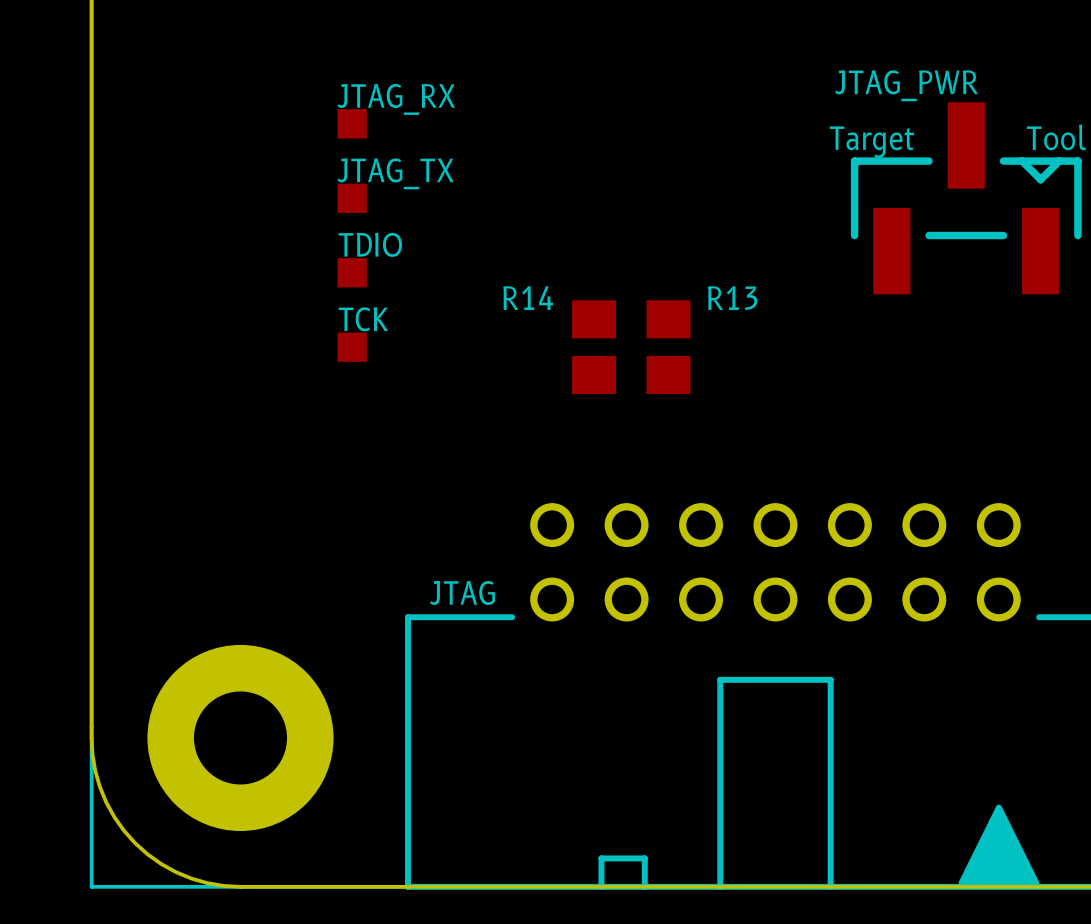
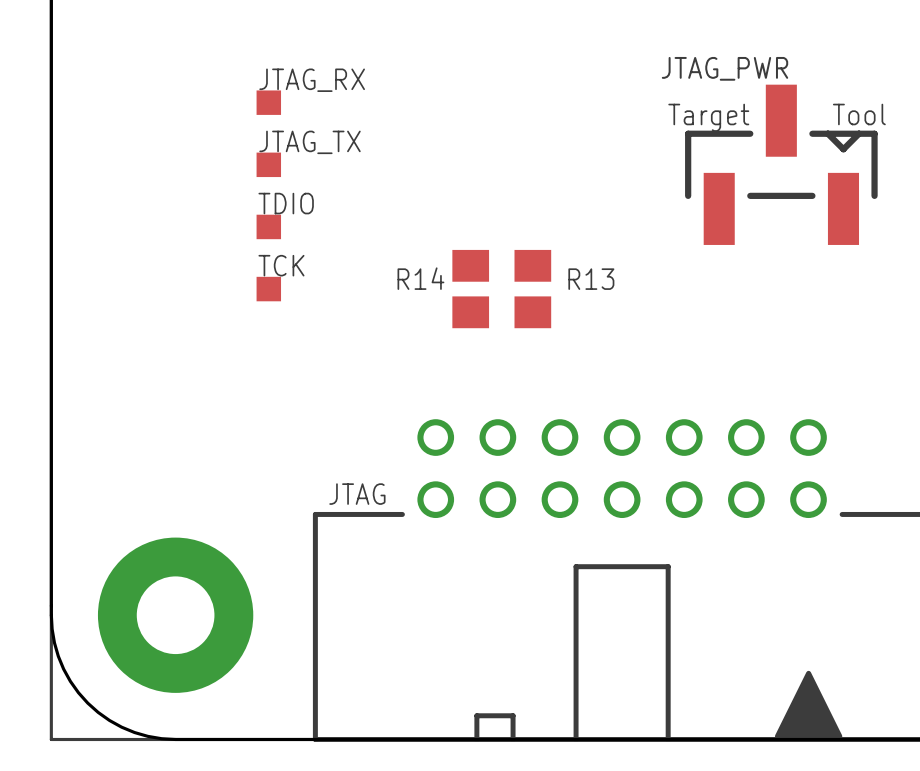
R14 name position: R14 (528, 298) -> R14 (420, 278)
R13 name position: R13 (732, 298) -> R13 (591, 279)

